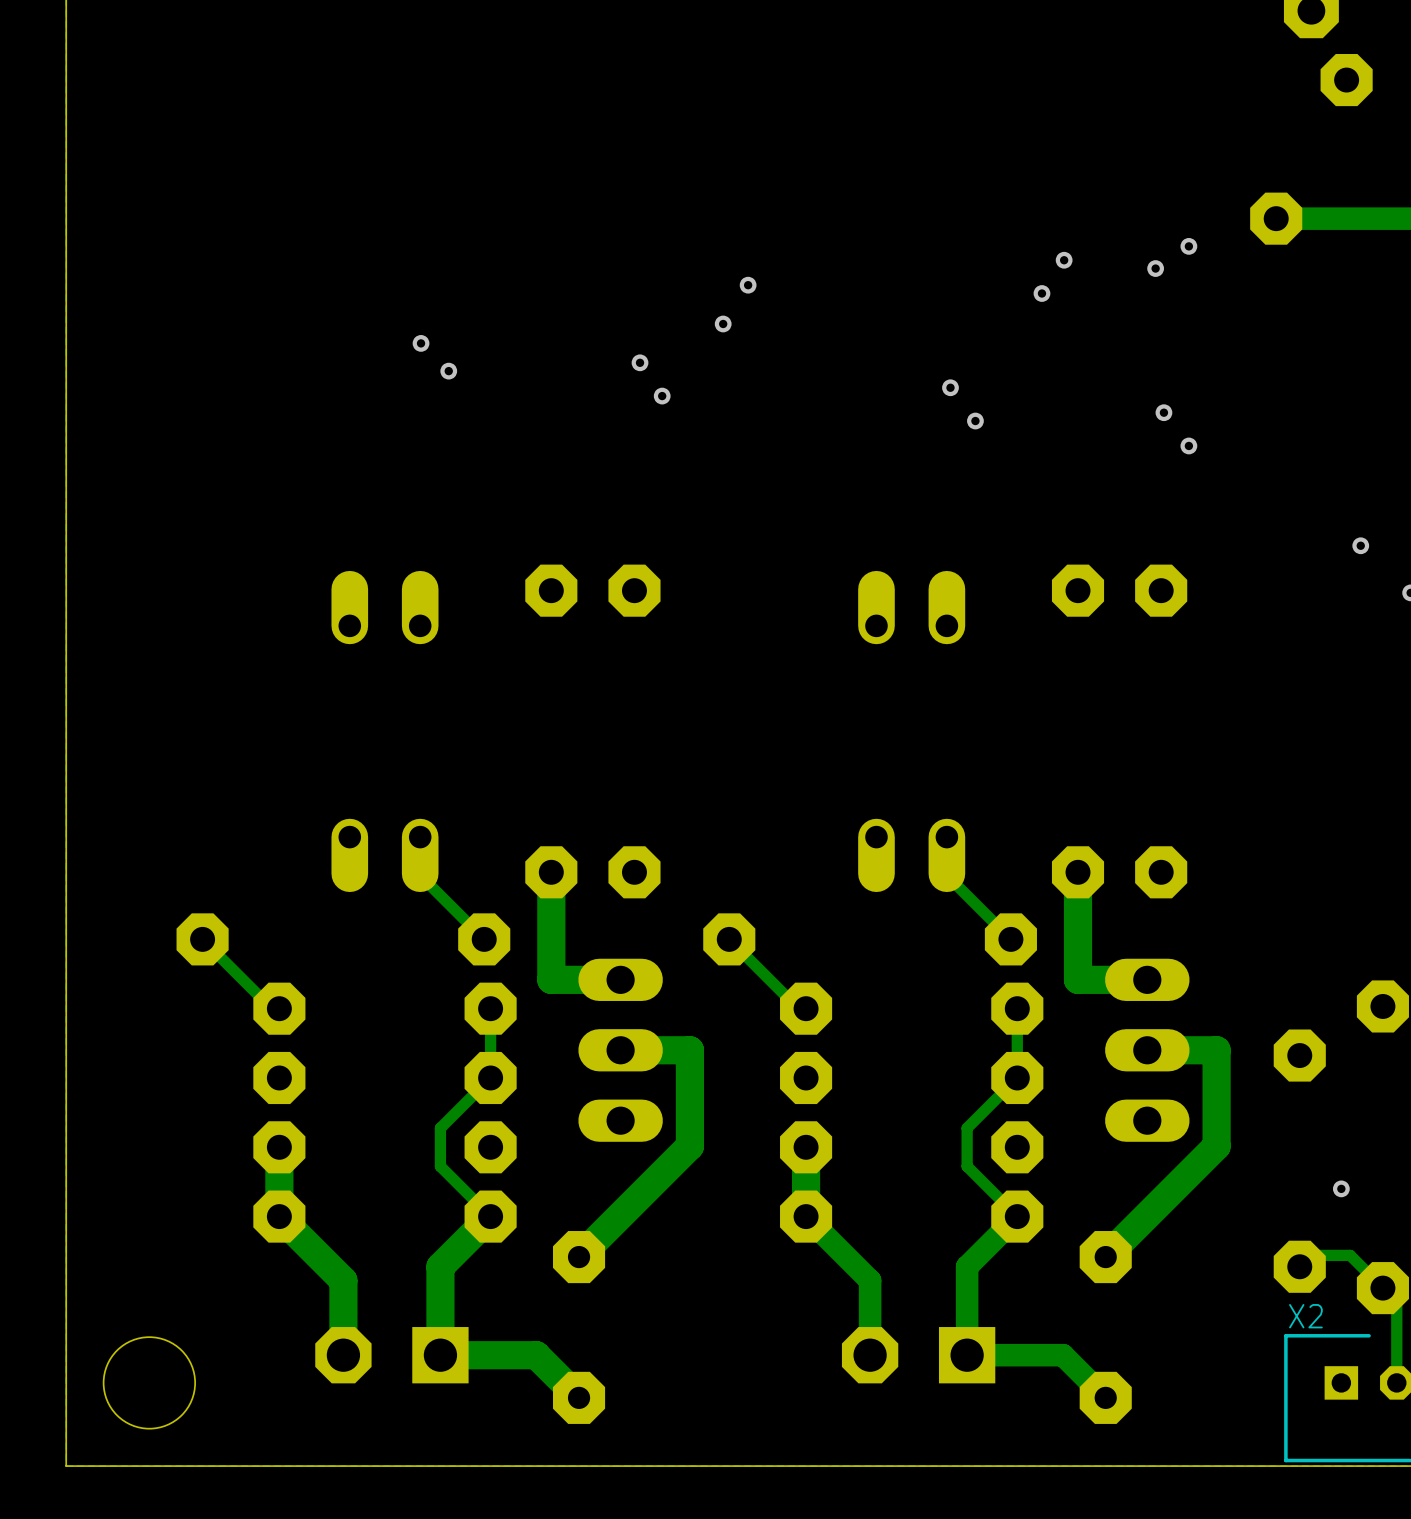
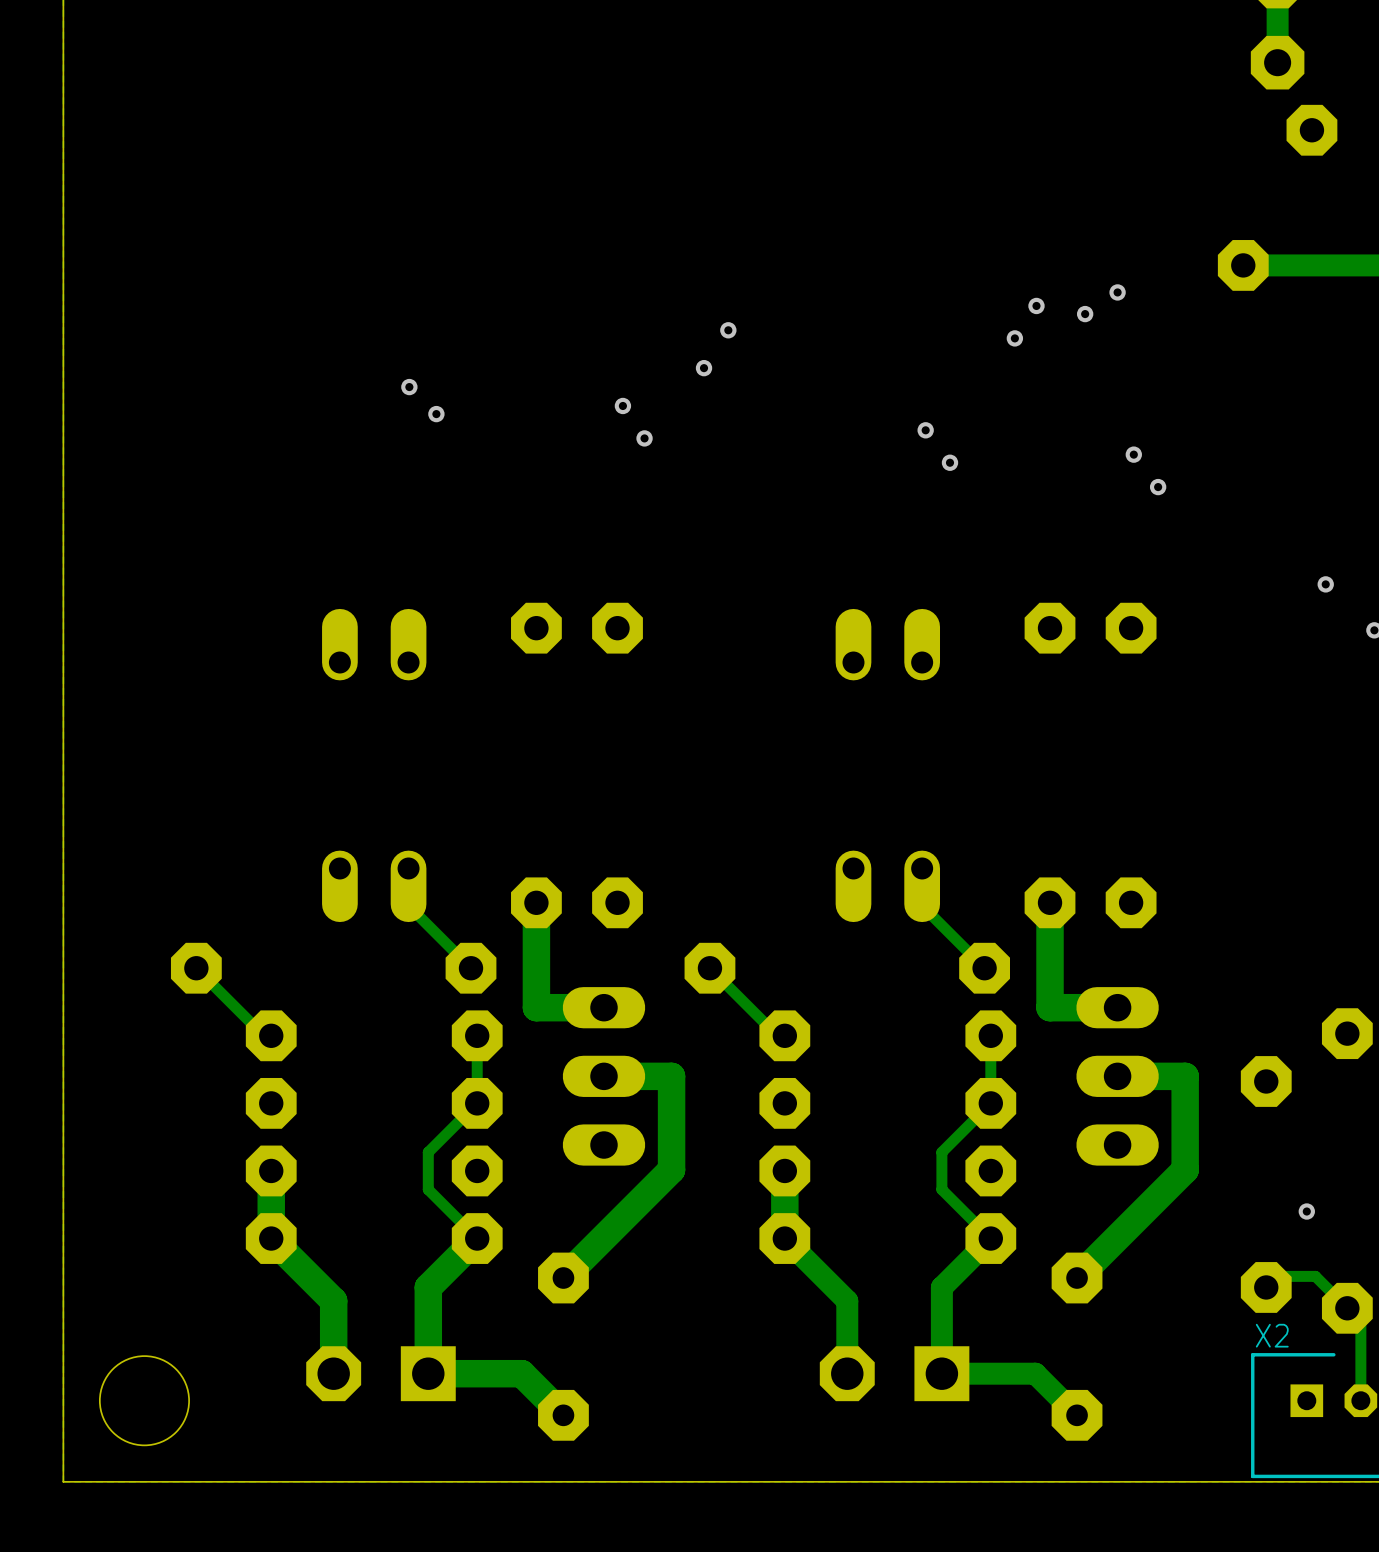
via: none -> (1117, 292)
via: (1188, 246) -> none
via: none -> (1085, 314)
via: (1155, 268) -> none

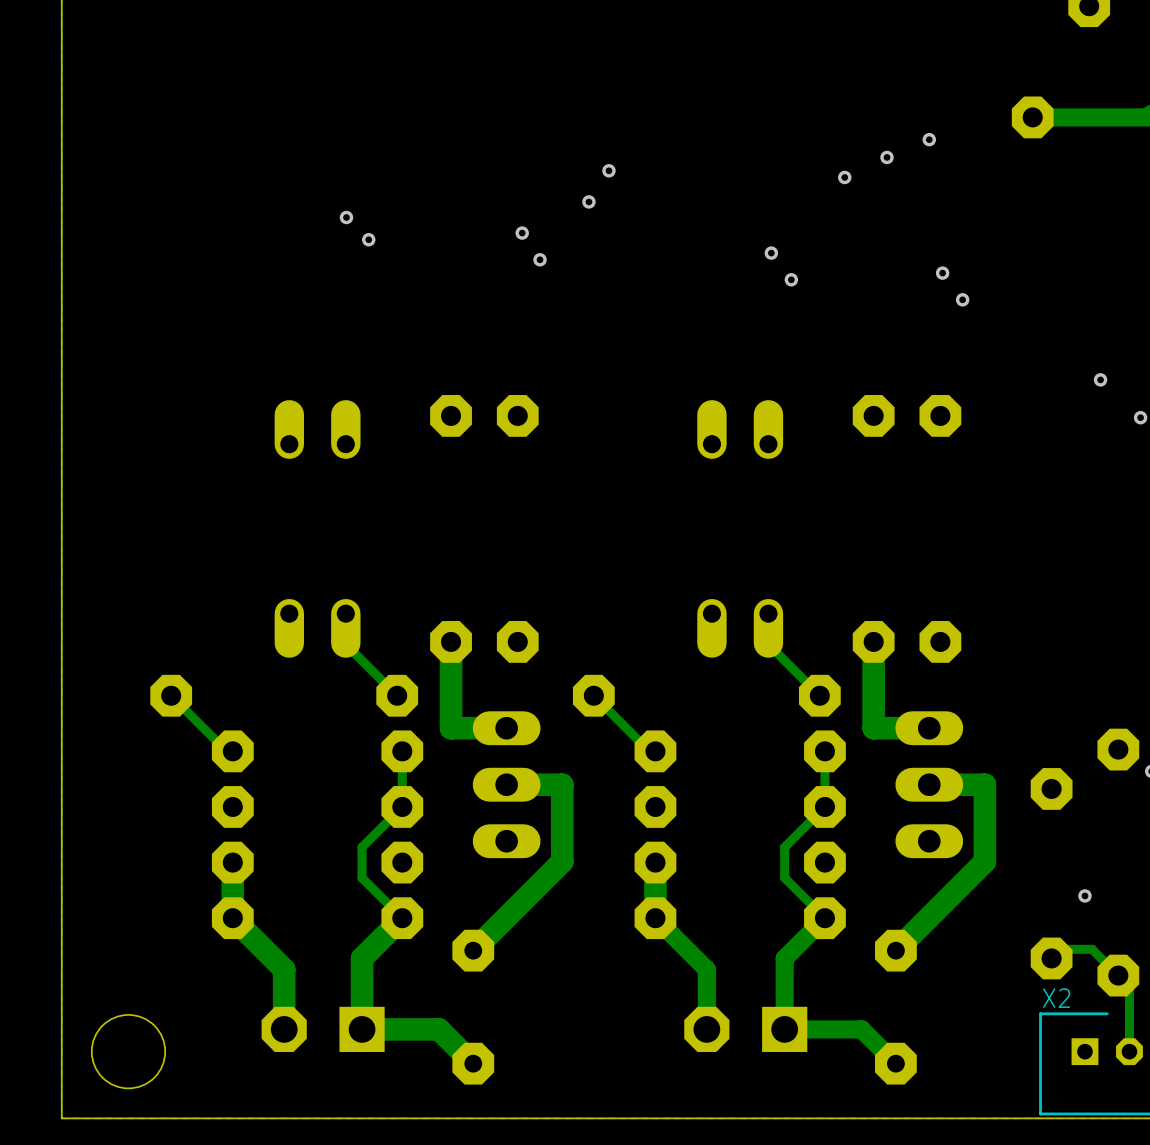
via: (1036, 305) -> none
via: none -> (887, 157)
via: (1085, 314) -> none

